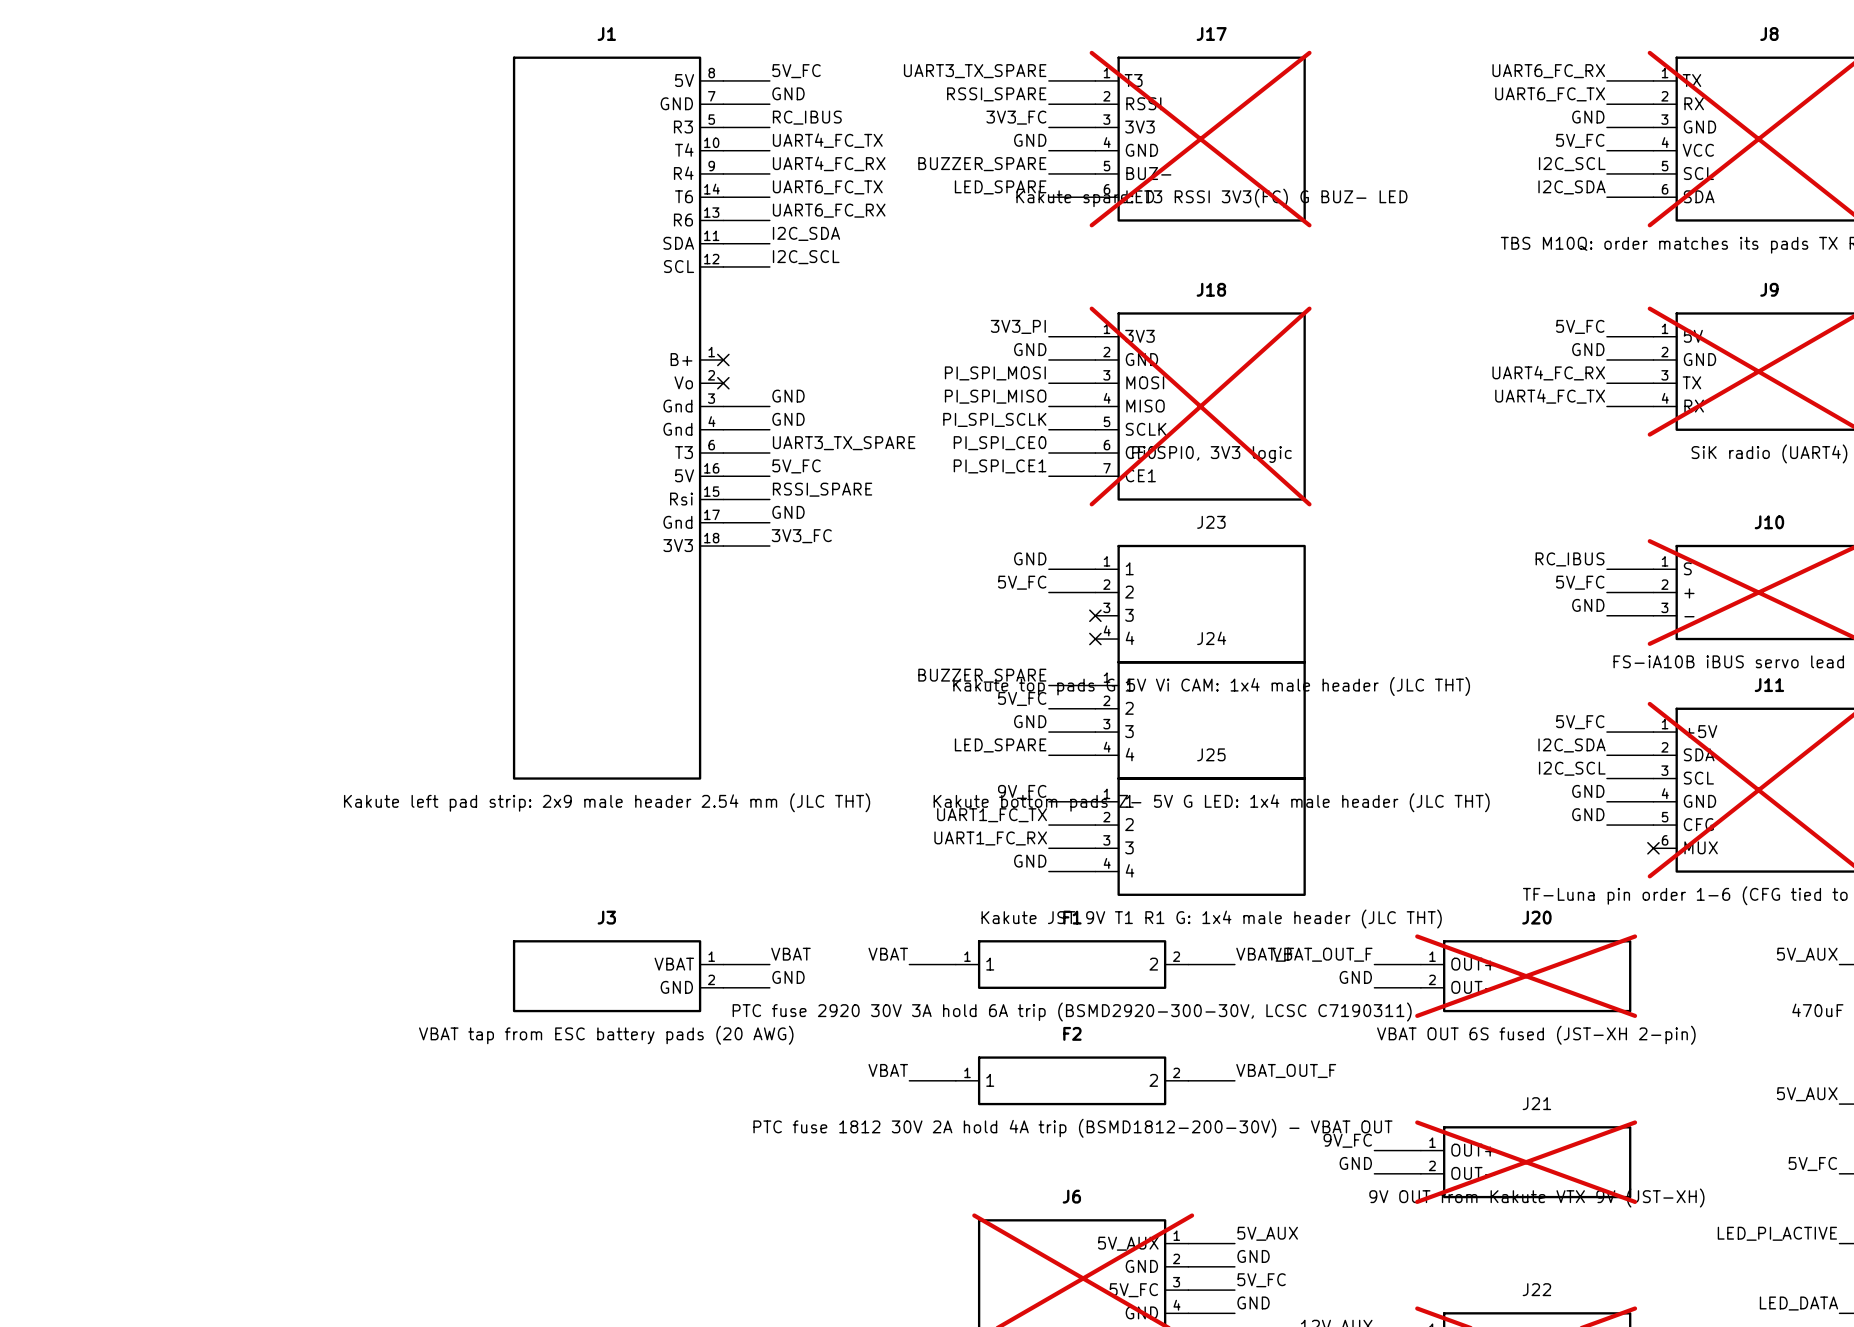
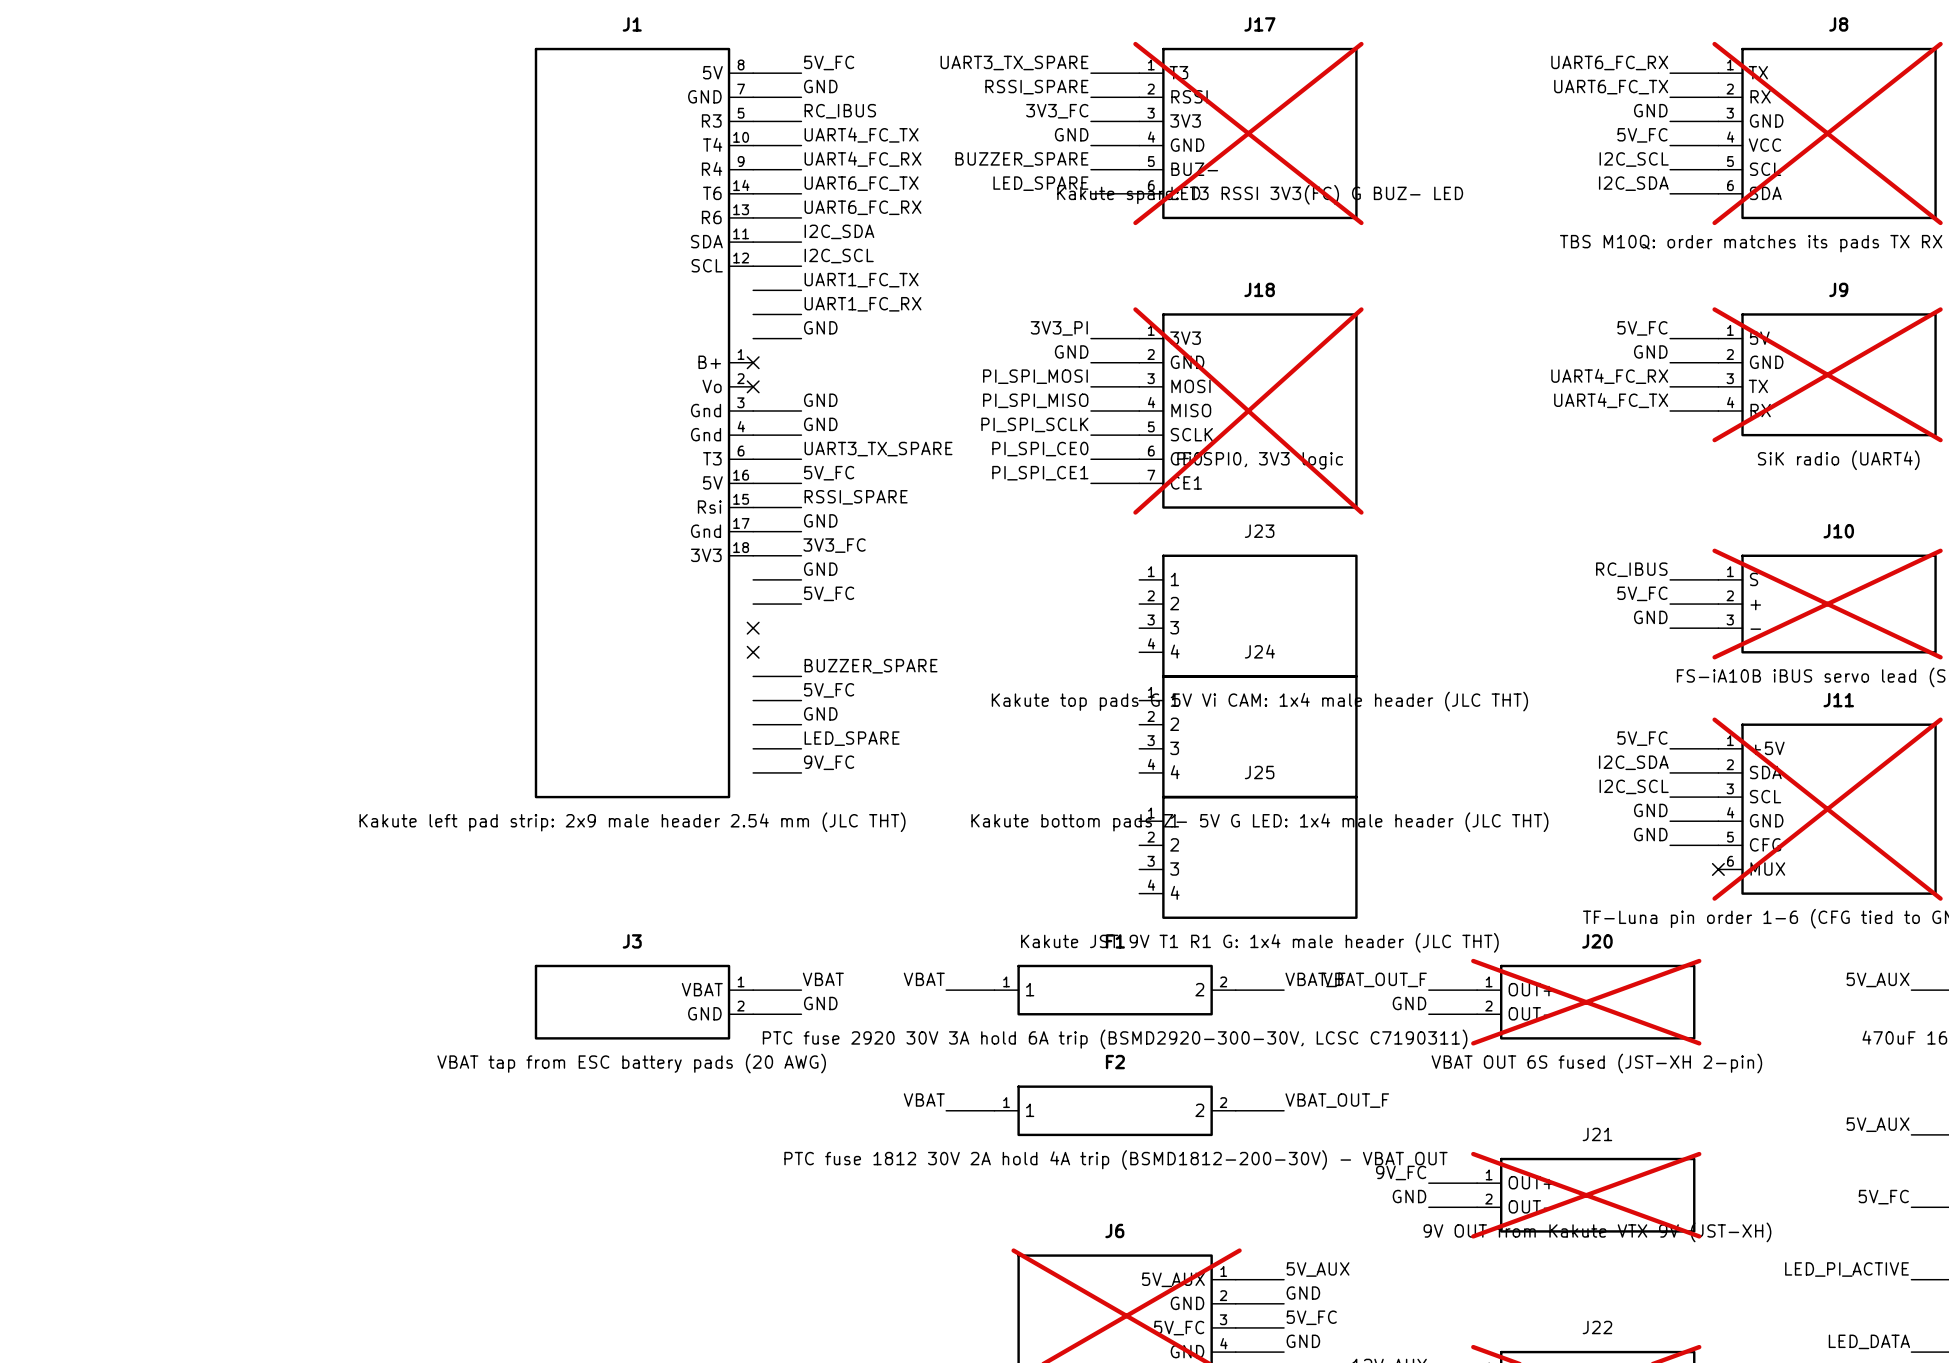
label: none -> UART1_FC_TX (861, 280)
wire: none -> (753, 290) (801, 290)
label: none -> UART1_FC_RX (862, 304)
wire: none -> (753, 314) (801, 314)
label: none -> GND (820, 327)
wire: none -> (753, 338) (801, 338)
label: none -> GND (820, 569)
label: GND (1030, 558) -> none
wire: none -> (753, 579) (801, 579)
wire: (1048, 569) (1095, 569) -> none
label: none -> 5V_FC (829, 593)
label: 5V_FC (1022, 582) -> none
wire: none -> (753, 604) (801, 604)
wire: (1048, 592) (1095, 592) -> none
no-connect mark: none -> (753, 628)
no-connect mark: (1095, 615) -> none
no-connect mark: none -> (753, 652)
no-connect mark: (1095, 639) -> none
label: none -> BUZZER_SPARE (871, 666)
wire: none -> (753, 676) (801, 676)
label: none -> 5V_FC (829, 690)
label: BUZZER_SPARE (982, 675) -> none
wire: none -> (753, 700) (801, 700)
wire: (1048, 685) (1095, 685) -> none
label: none -> GND (820, 713)
label: 5V_FC (1022, 698) -> none
wire: none -> (753, 724) (801, 724)
wire: (1048, 708) (1095, 708) -> none
label: GND (1030, 721) -> none
label: none -> LED_SPARE (852, 738)
wire: none -> (753, 748) (801, 748)
wire: (1048, 732) (1095, 732) -> none
label: none -> 9V_FC (829, 762)
label: LED_SPARE (1000, 745) -> none
wire: none -> (753, 772) (801, 772)
wire: (1048, 755) (1095, 755) -> none
label: 9V_FC (1022, 791) -> none
wire: (1048, 801) (1095, 801) -> none
label: UART1_FC_TX (992, 815) -> none
wire: (1048, 825) (1095, 825) -> none
label: UART1_FC_RX (990, 838) -> none
wire: (1048, 848) (1095, 848) -> none
label: GND (1030, 861) -> none
wire: (1048, 871) (1095, 871) -> none

